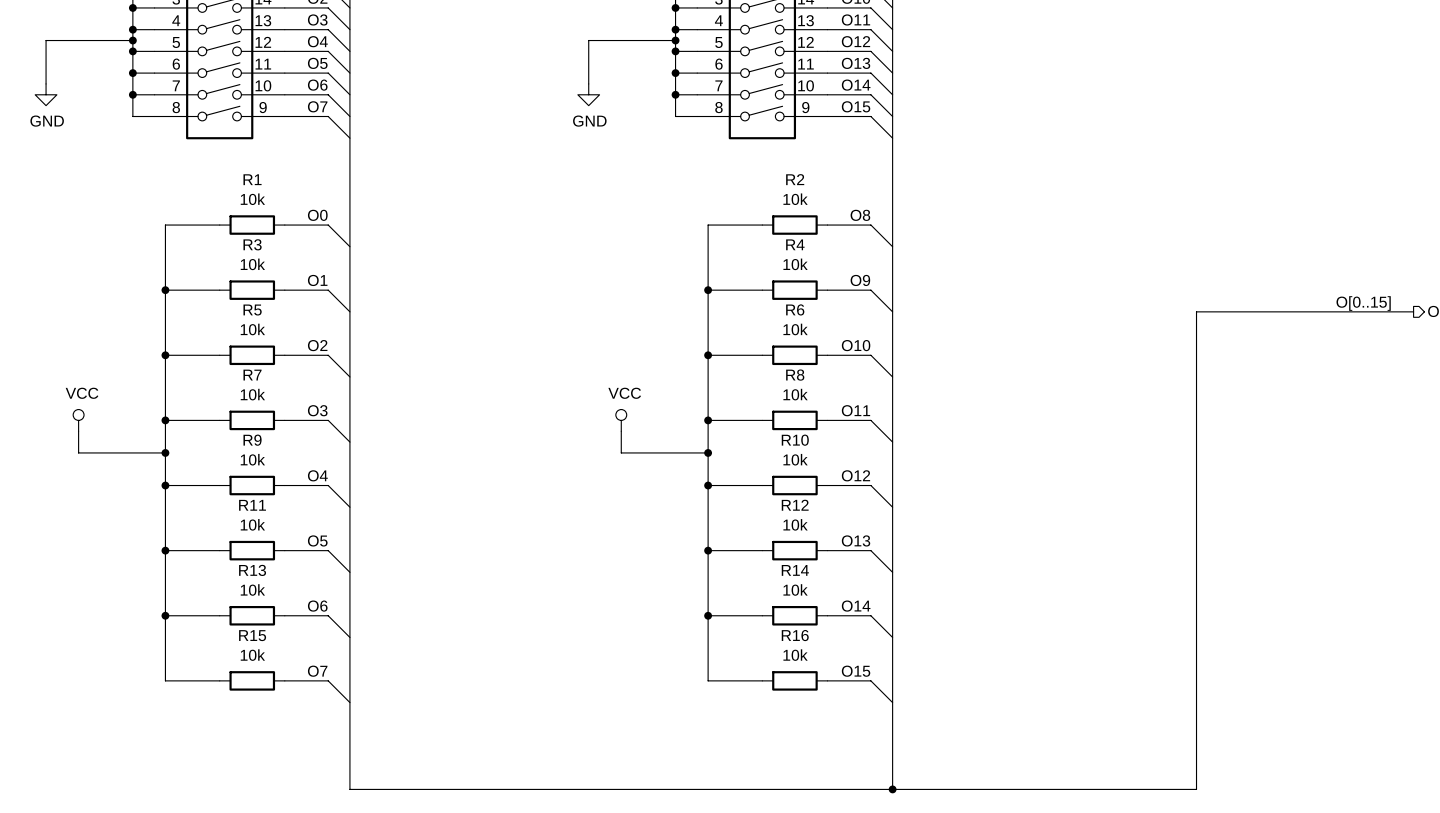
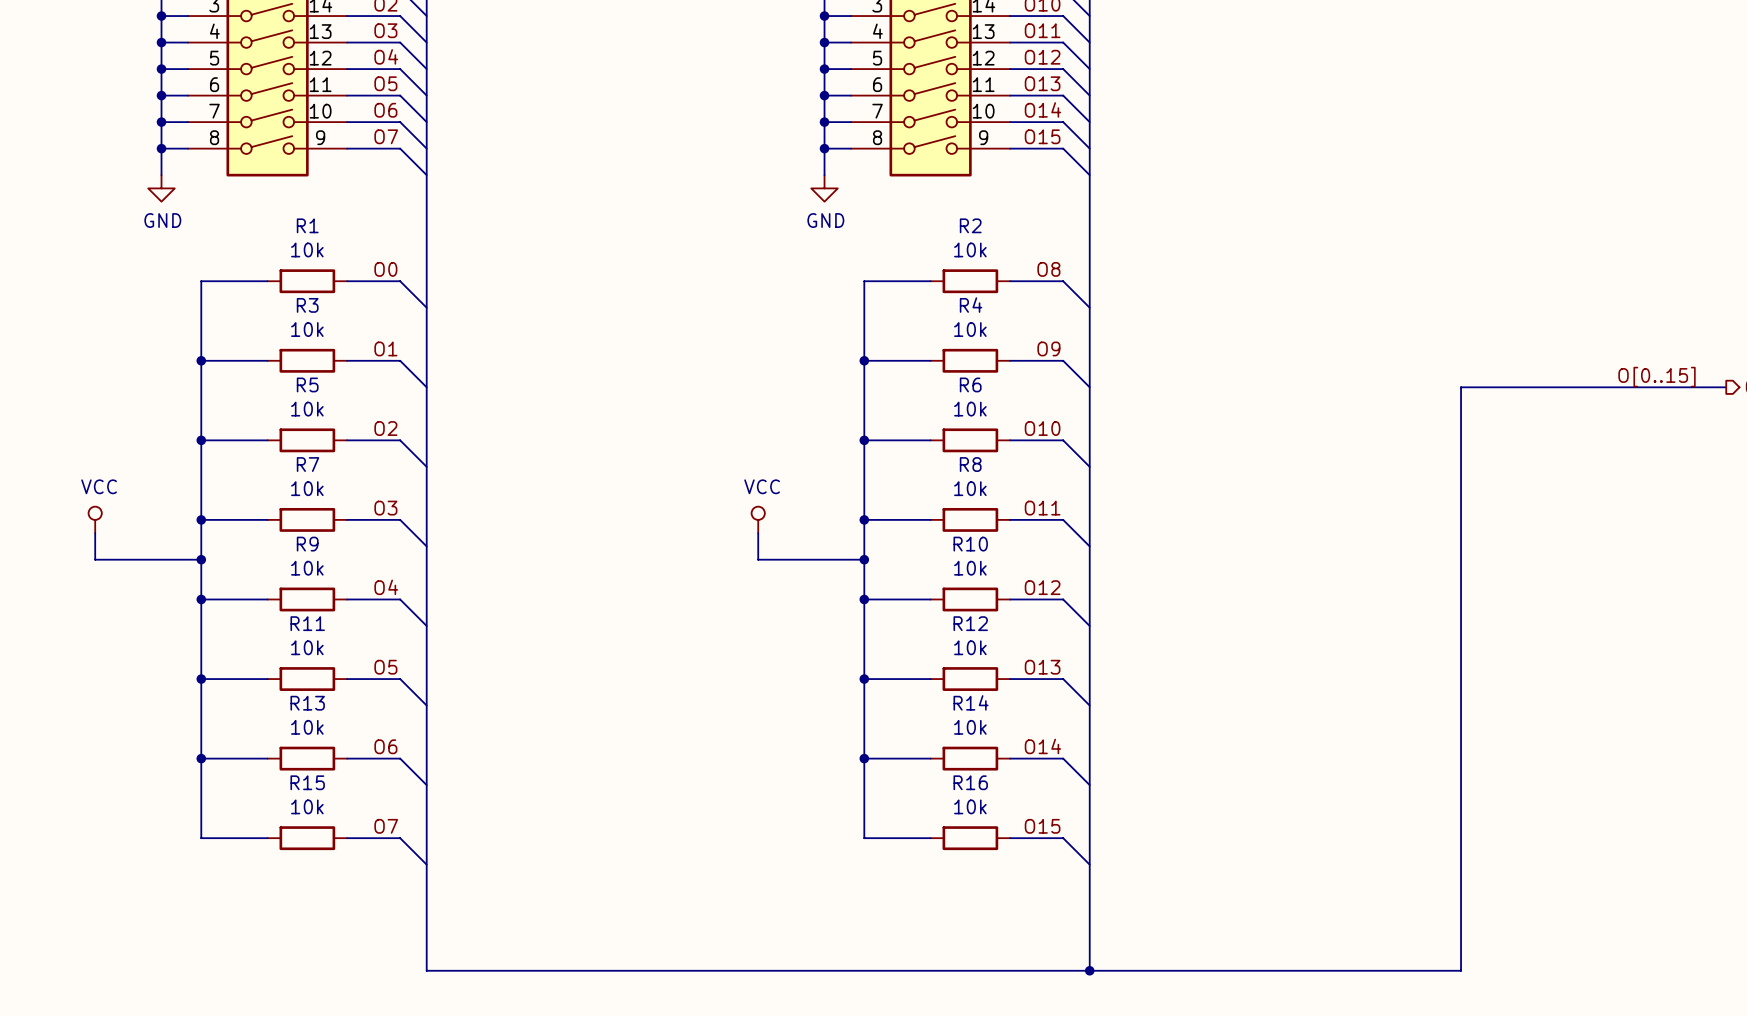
wire: (132, 40) (46, 40) (46, 83) -> none
junction: (132, 40) -> none
wire: (675, 40) (588, 40) (588, 83) -> none
junction: (675, 40) -> none
power symbol position: GND (46, 94) -> GND (161, 188)
power symbol position: GND (588, 94) -> GND (824, 188)
wire: none -> (161, 148) (161, 175)
junction: none -> (161, 148)
wire: none -> (824, 148) (824, 175)
junction: none -> (824, 148)

